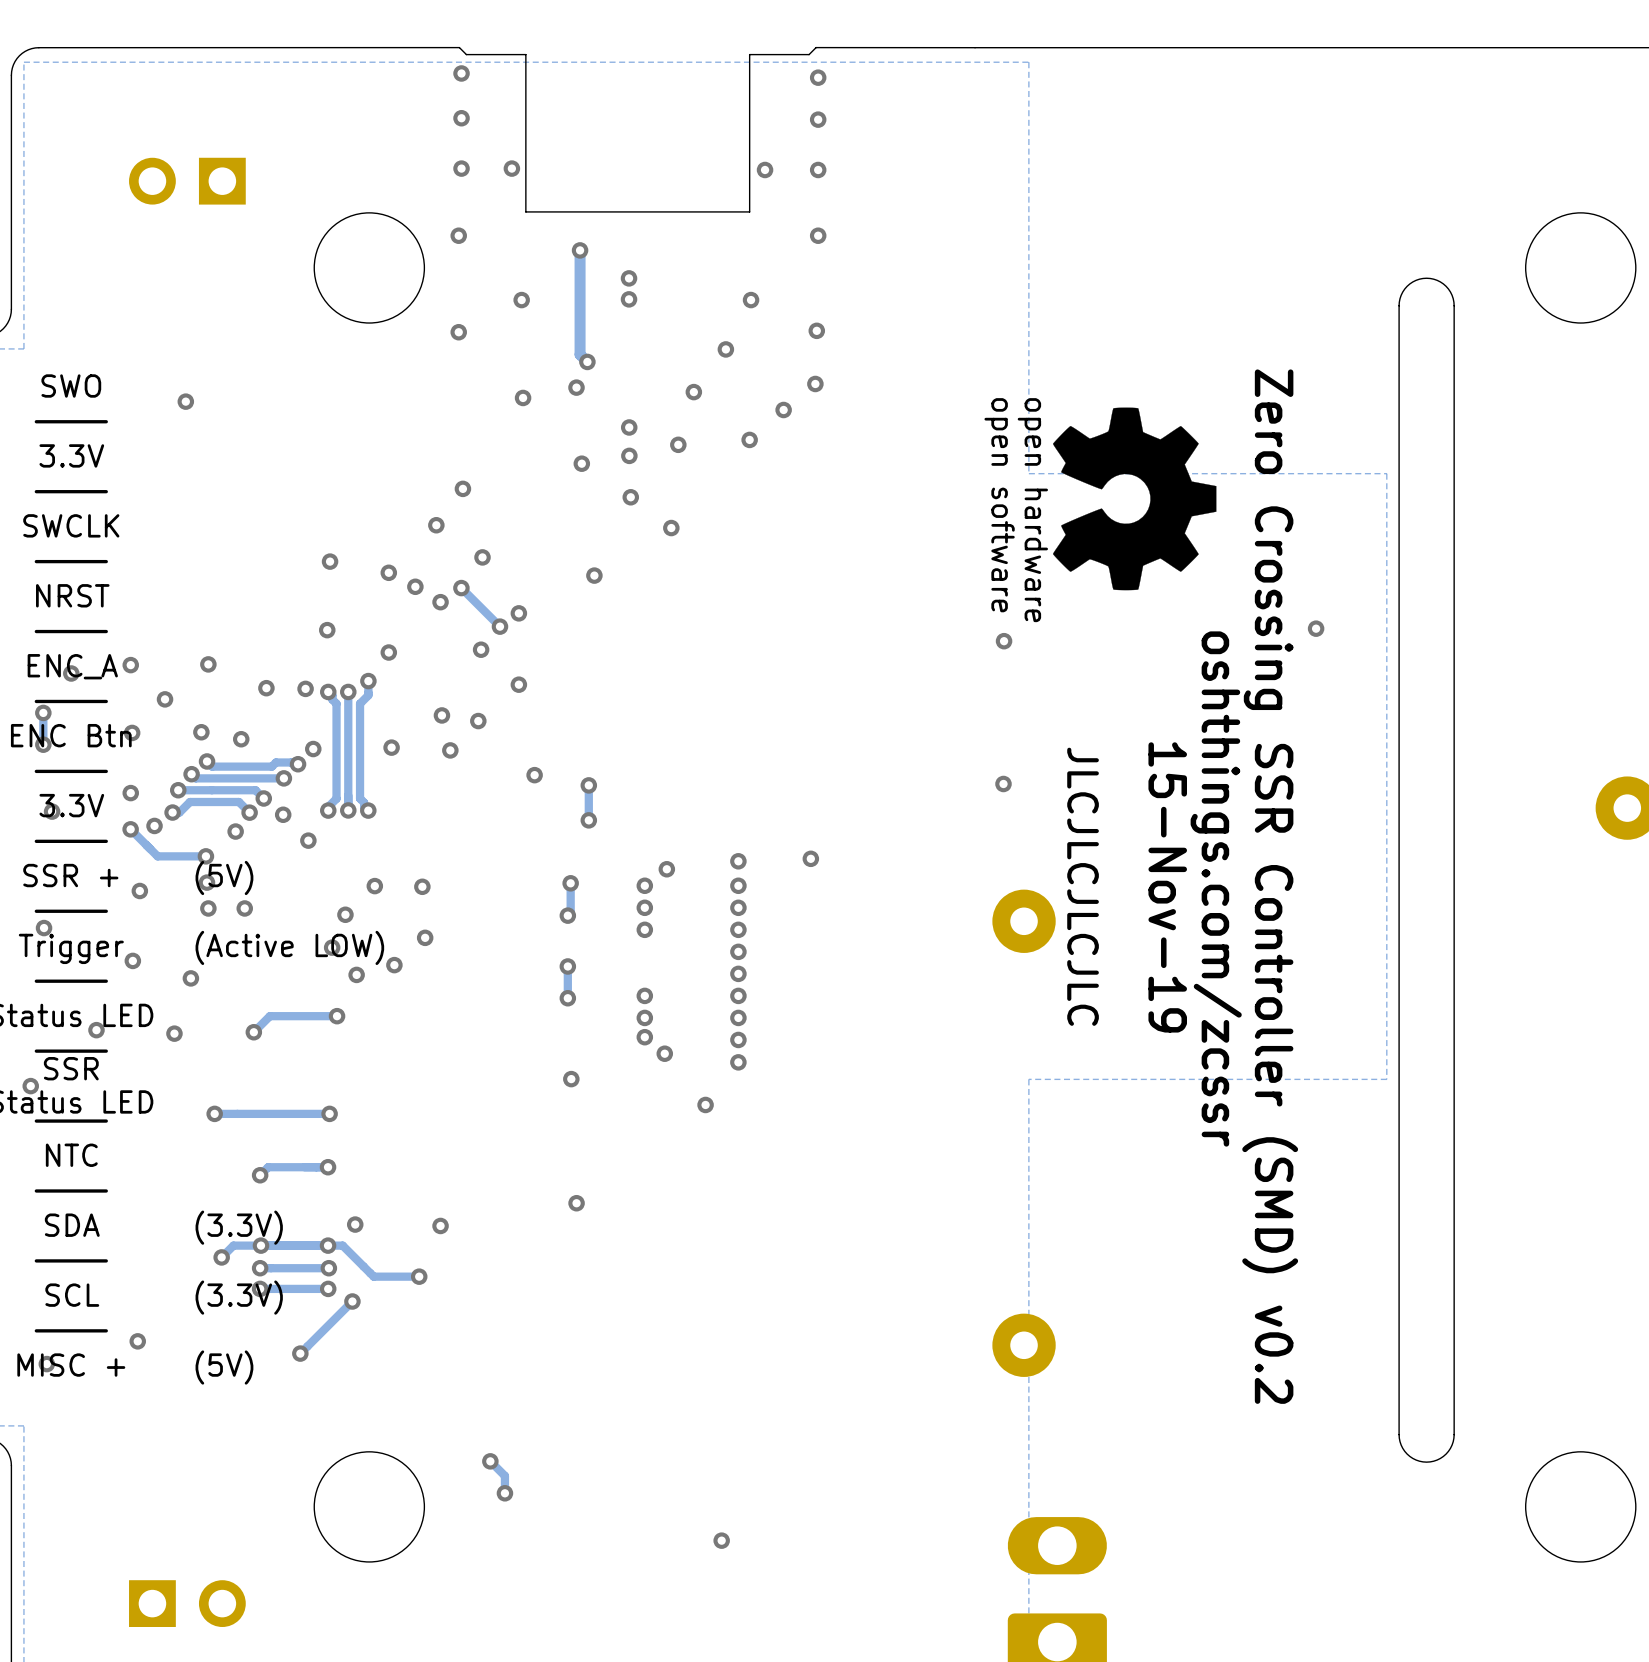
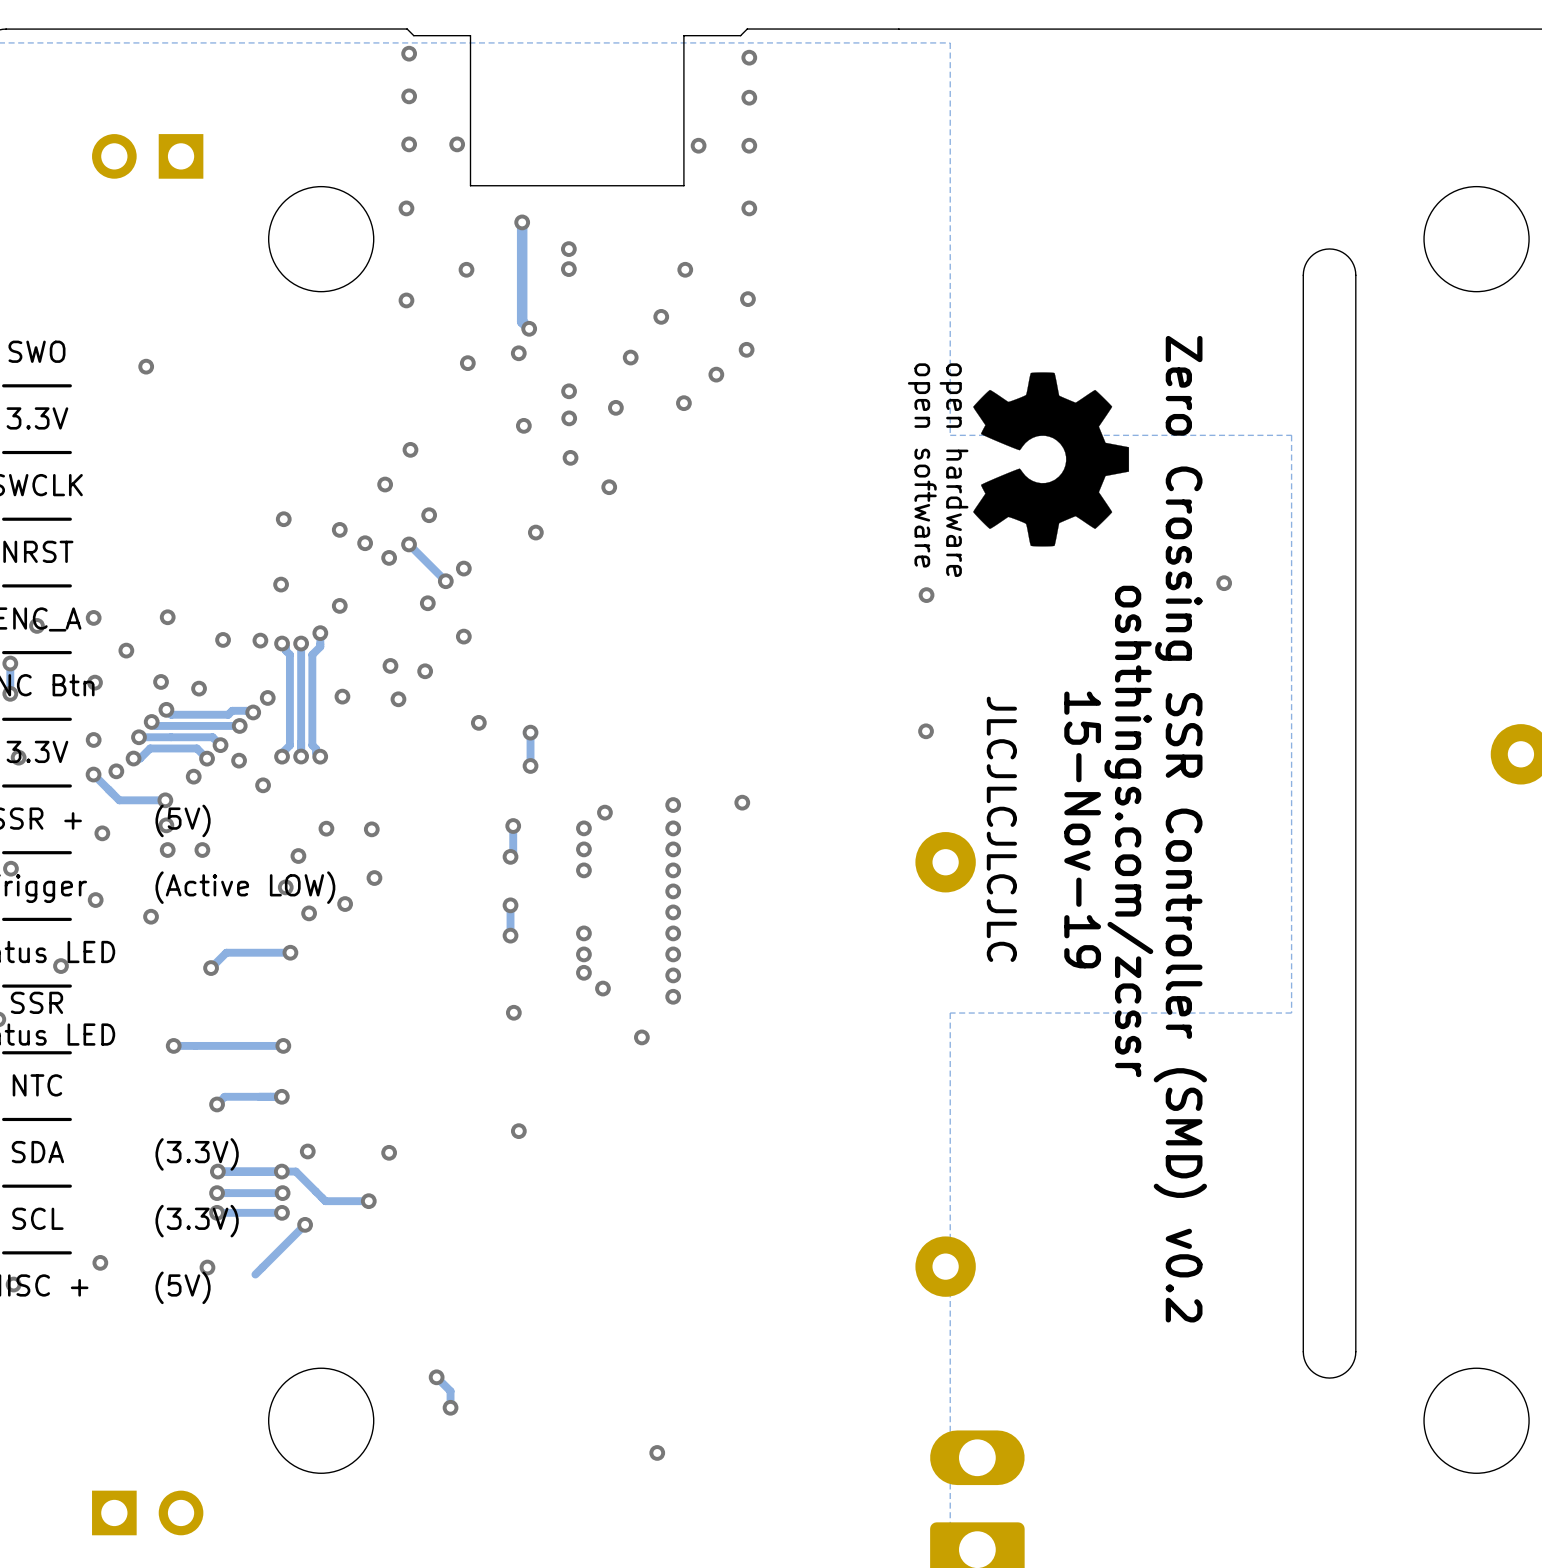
via: (174, 1033) -> none
track: (260, 1245) (233, 1245) (221, 1257) -> none
via: (221, 1257) -> none
via: none -> (207, 1267)
via: (300, 1353) -> none

